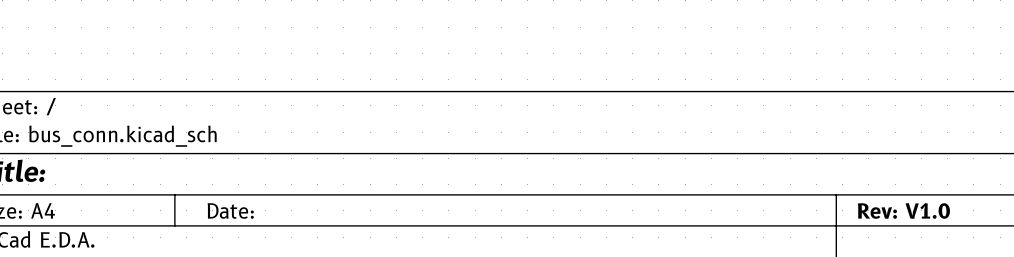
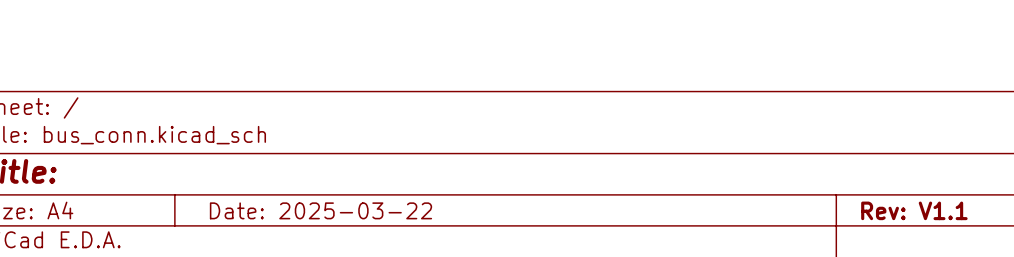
title block: Date: (230, 210) -> Date: 2025-03-22 (320, 210)
title block: Rev: V1.0 (903, 210) -> Rev: V1.1 (914, 210)

